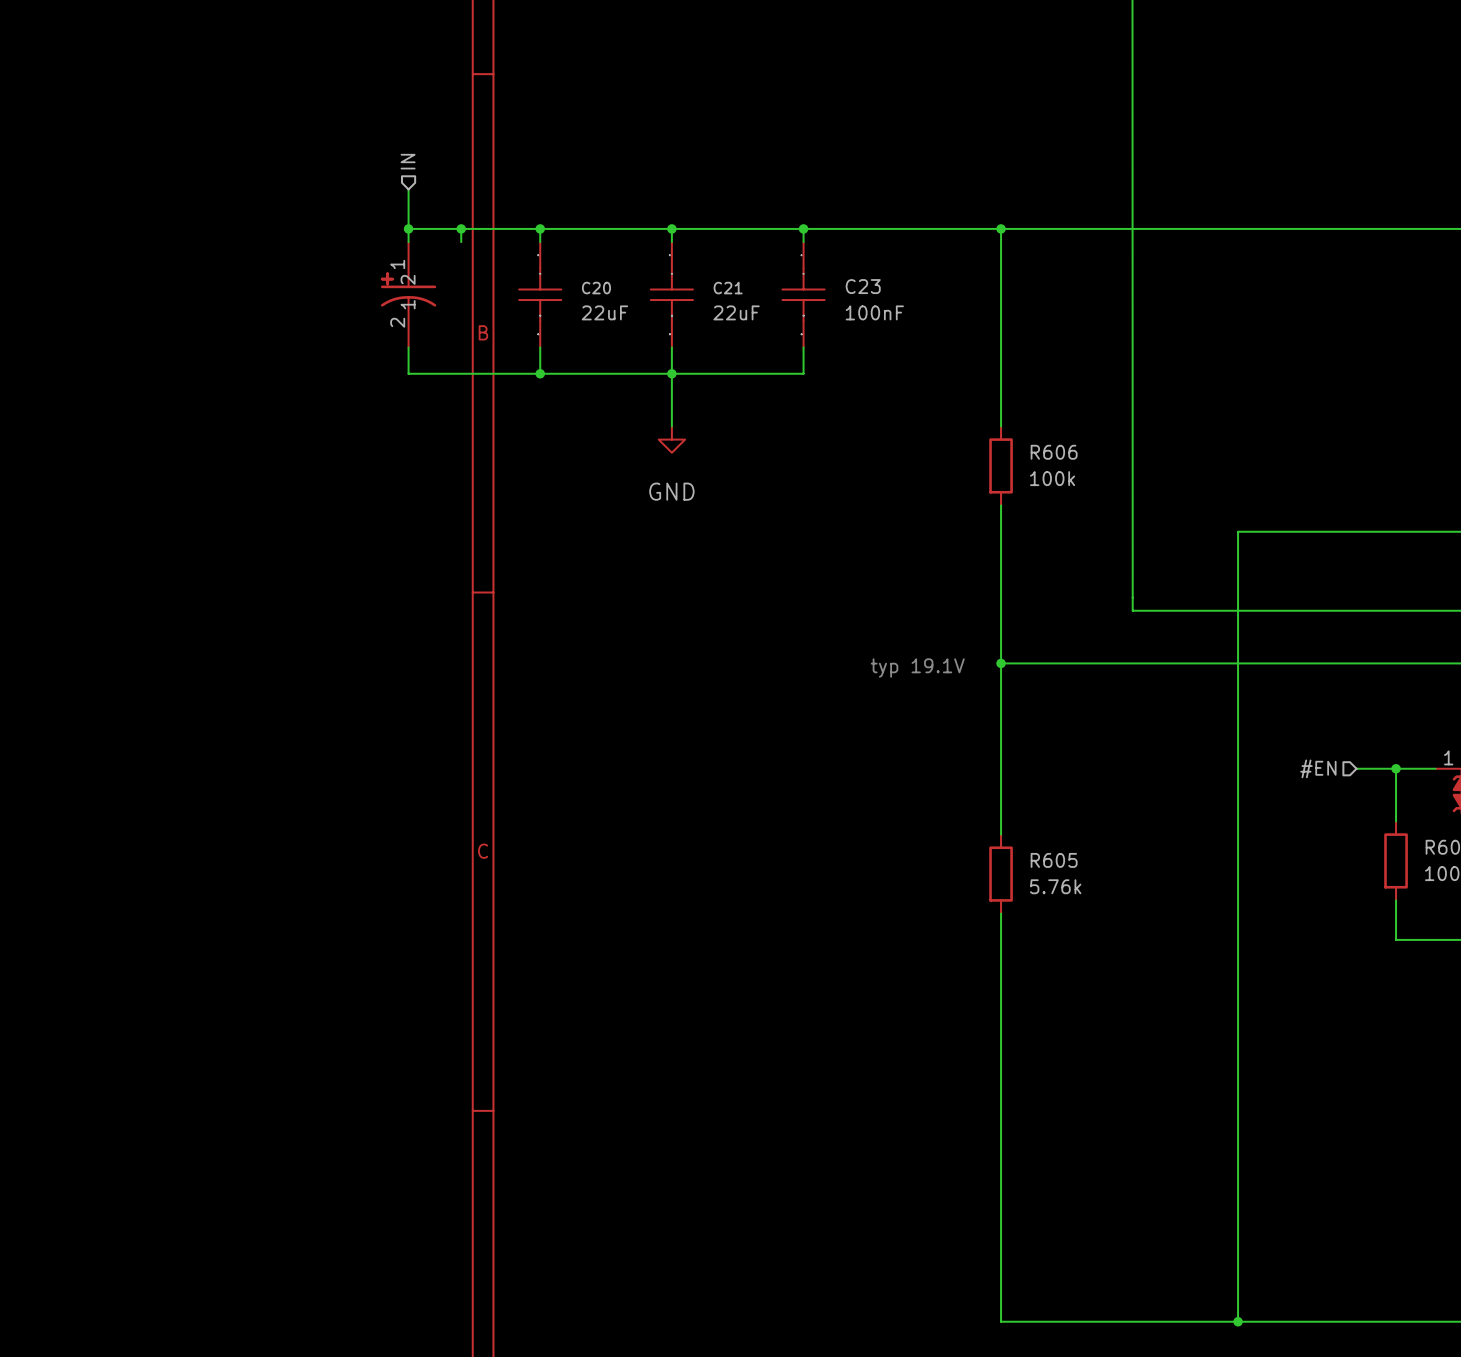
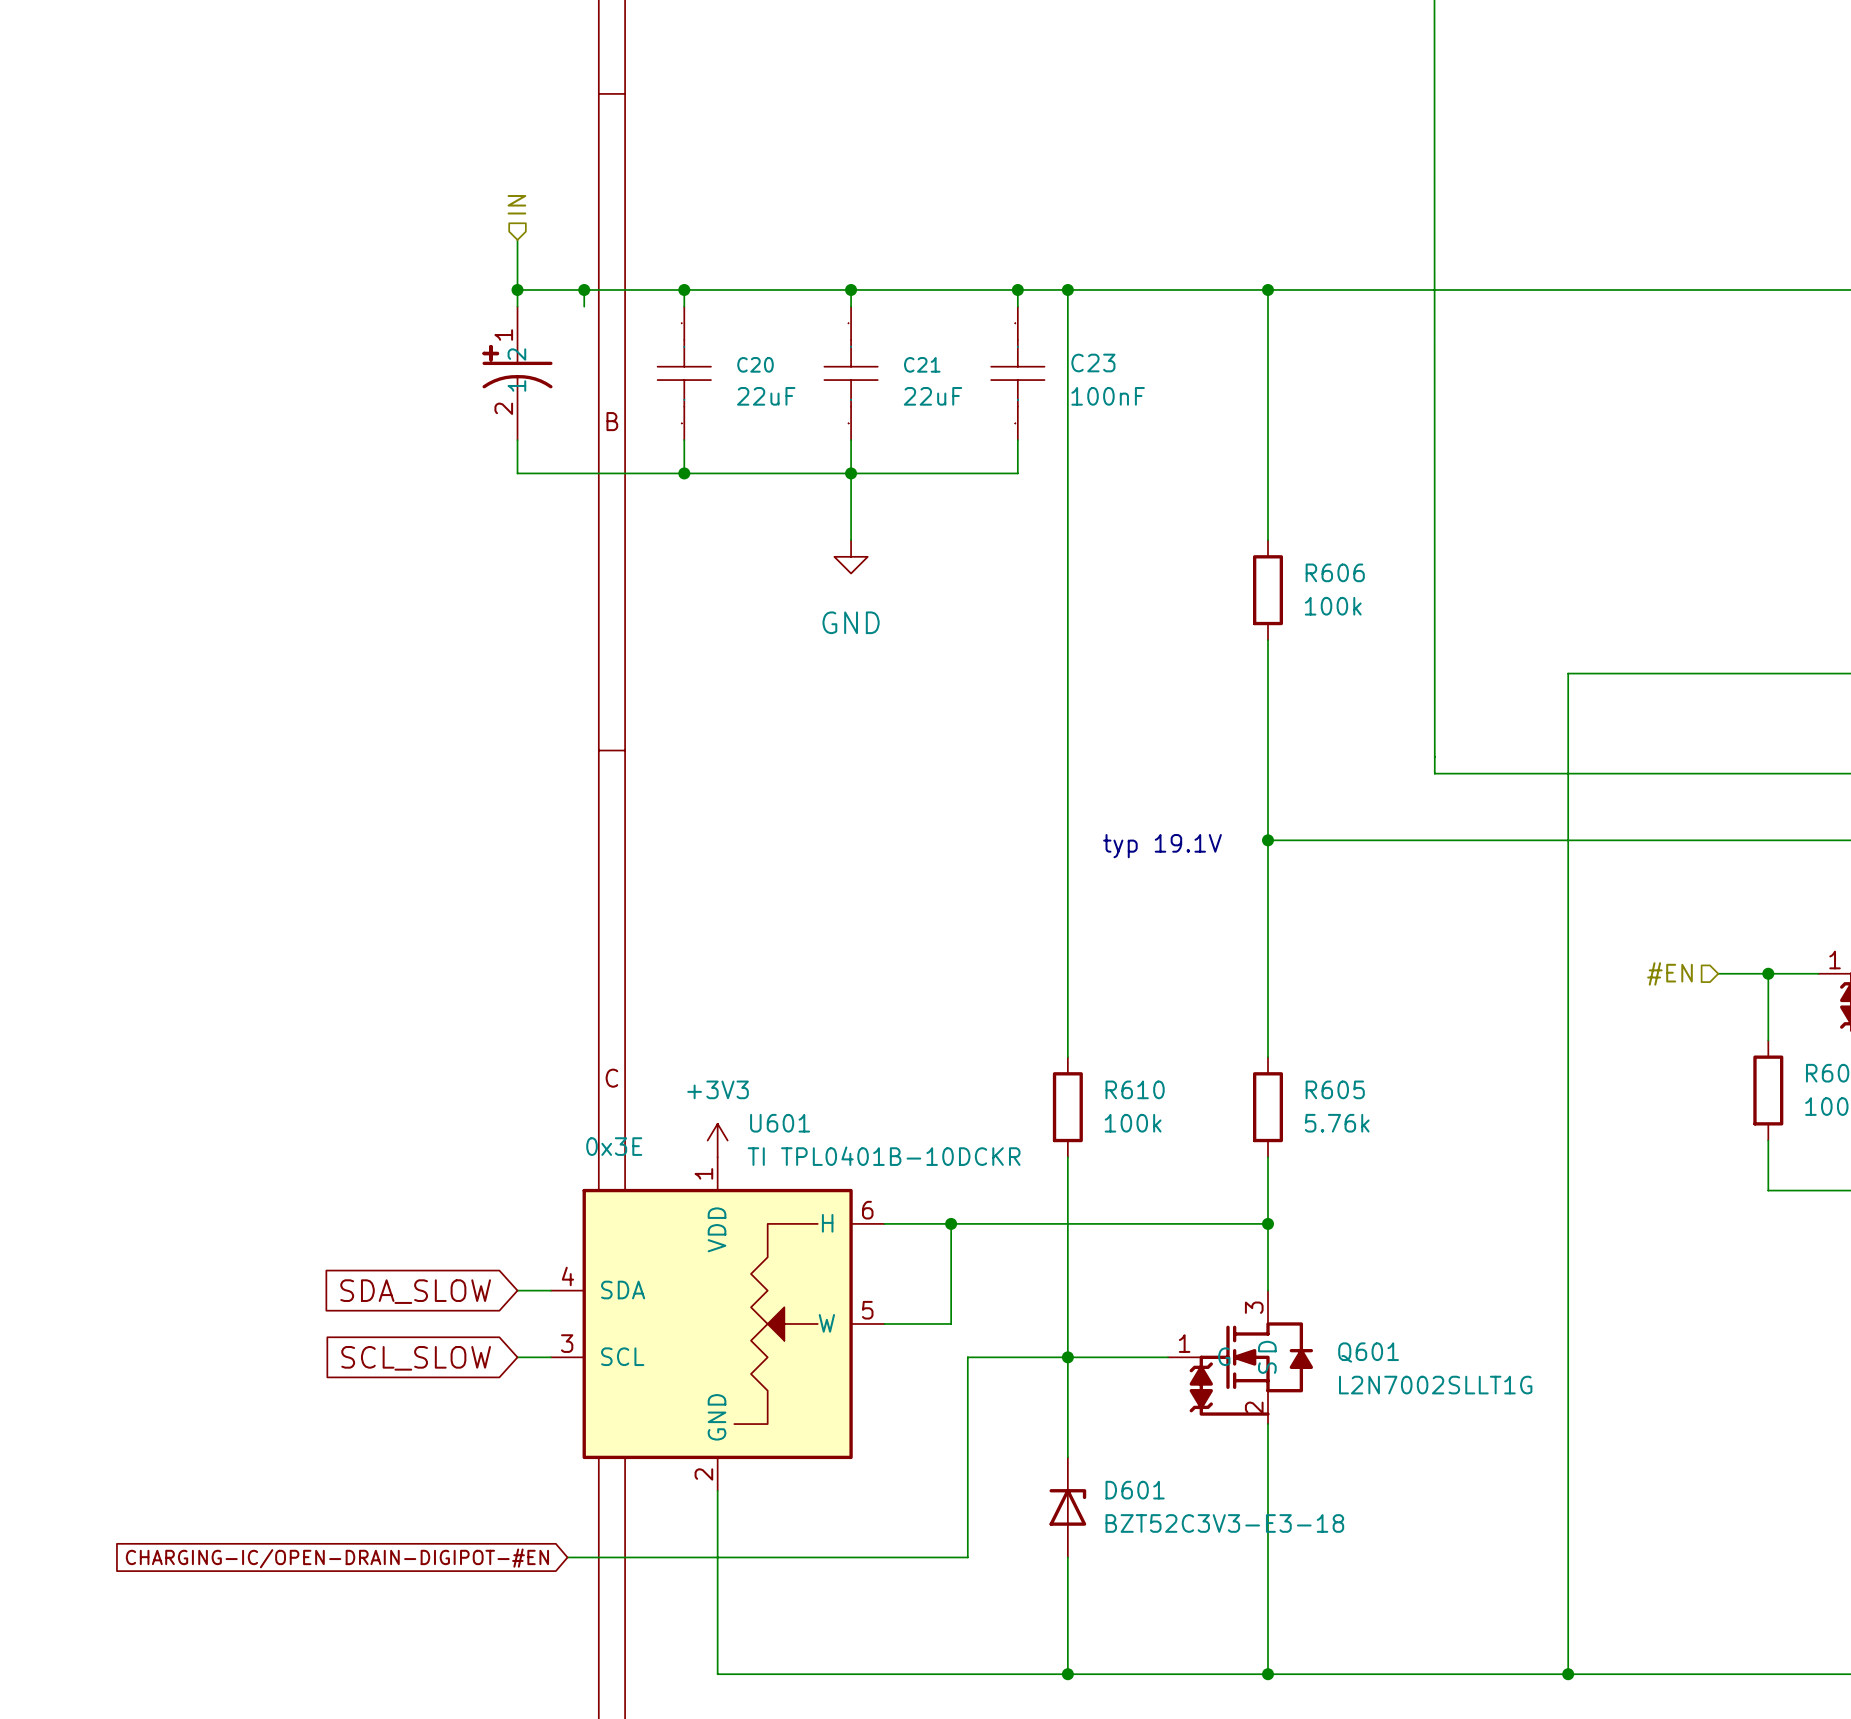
wire: none -> (1067, 289) (1067, 1057)
junction: none -> (1067, 289)
R610: none -> 100k (1067, 1107)
power symbol: none -> +3V3 (717, 1140)
wire: none -> (1067, 1157) (1067, 1457)
wire: none -> (884, 1223) (1268, 1223)
wire: none -> (951, 1223) (951, 1323) (884, 1323)
junction: none -> (951, 1223)
junction: none -> (1268, 1223)
wire: none -> (517, 1290) (550, 1290)
global label: none -> SDA_SLOW (415, 1291)
U601: none -> TI TPL0401B-10DCKR (717, 1323)
wire: none -> (517, 1357) (550, 1357)
junction: none -> (1067, 1357)
wire: none -> (1167, 1357) (967, 1357) (967, 1557) (567, 1557)
Q601: none -> L2N7002SLLT1G (1240, 1357)
global label: none -> SCL_SLOW (416, 1358)
wire: none -> (717, 1490) (717, 1674) (1268, 1674)
D601: none -> BZT52C3V3-E3-18 (1067, 1507)
wire: none -> (1067, 1557) (1067, 1674)
global label: none -> CHARGING-IC/OPEN-DRAIN-DIGIPOT-#EN (337, 1558)
junction: none -> (1067, 1674)
junction: none -> (1268, 1674)

